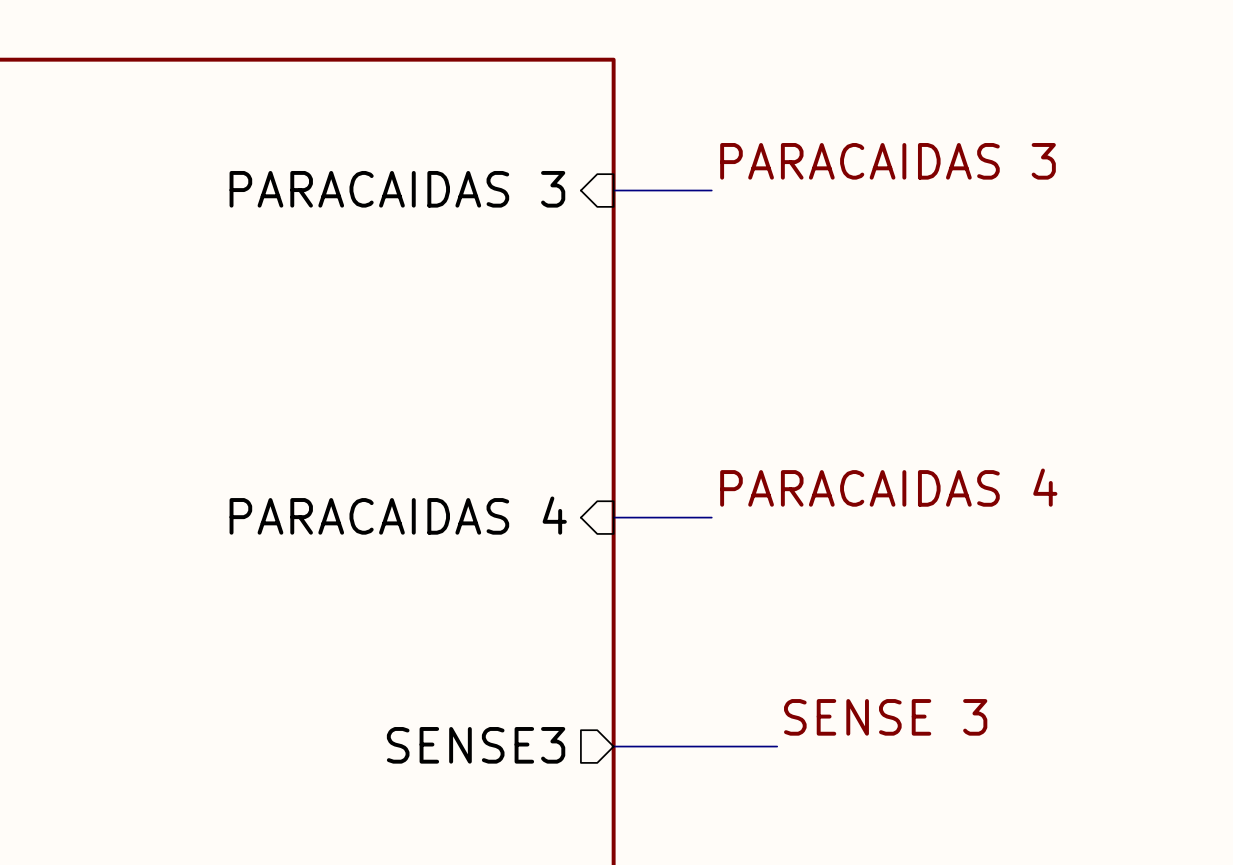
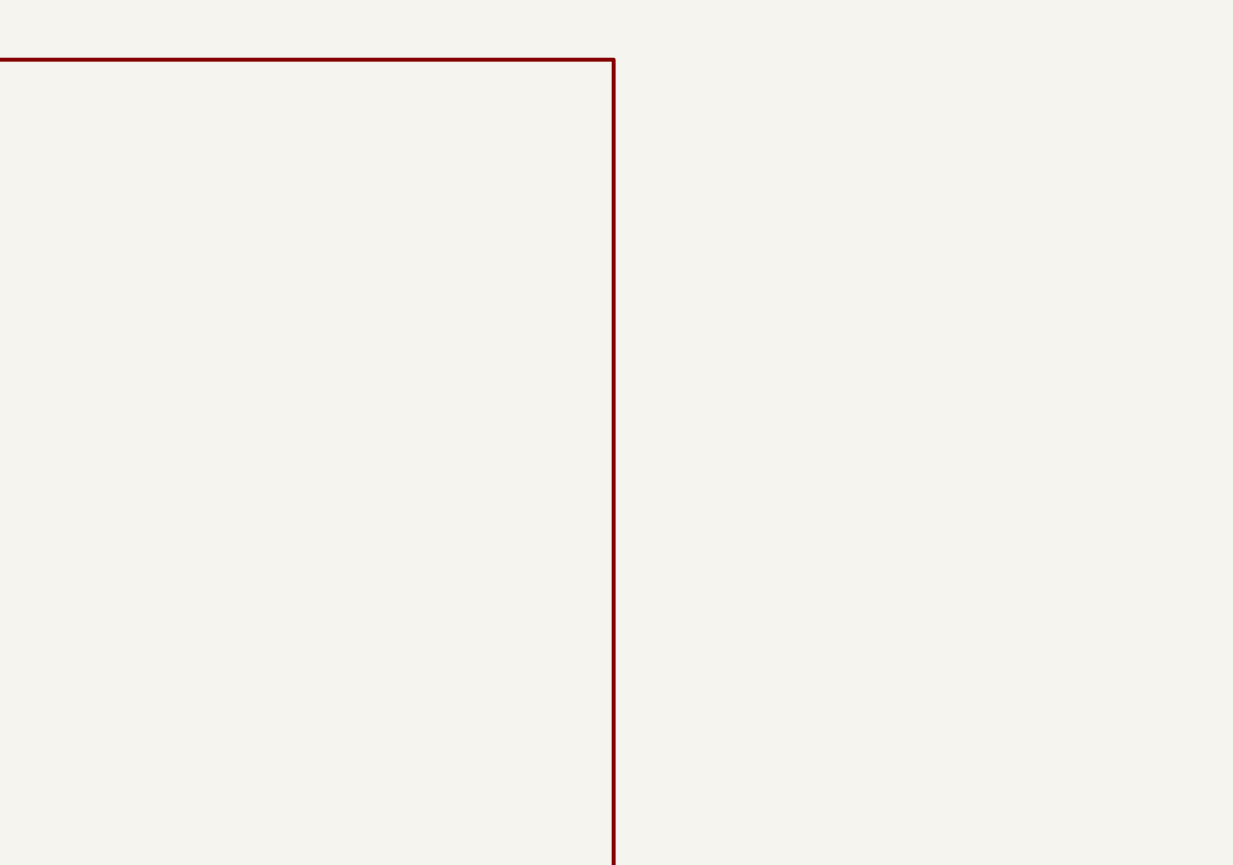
label: PARACAIDAS 3 (888, 161) -> none
sheet pin: PARACAIDAS 3 (397, 189) -> none
wire: (613, 190) (711, 190) -> none
label: PARACAIDAS 4 (888, 487) -> none
sheet pin: PARACAIDAS 4 (398, 515) -> none
wire: (613, 517) (711, 517) -> none
label: SENSE 3 (885, 717) -> none
sheet pin: SENSE3 (476, 745) -> none
wire: (613, 746) (777, 746) -> none

